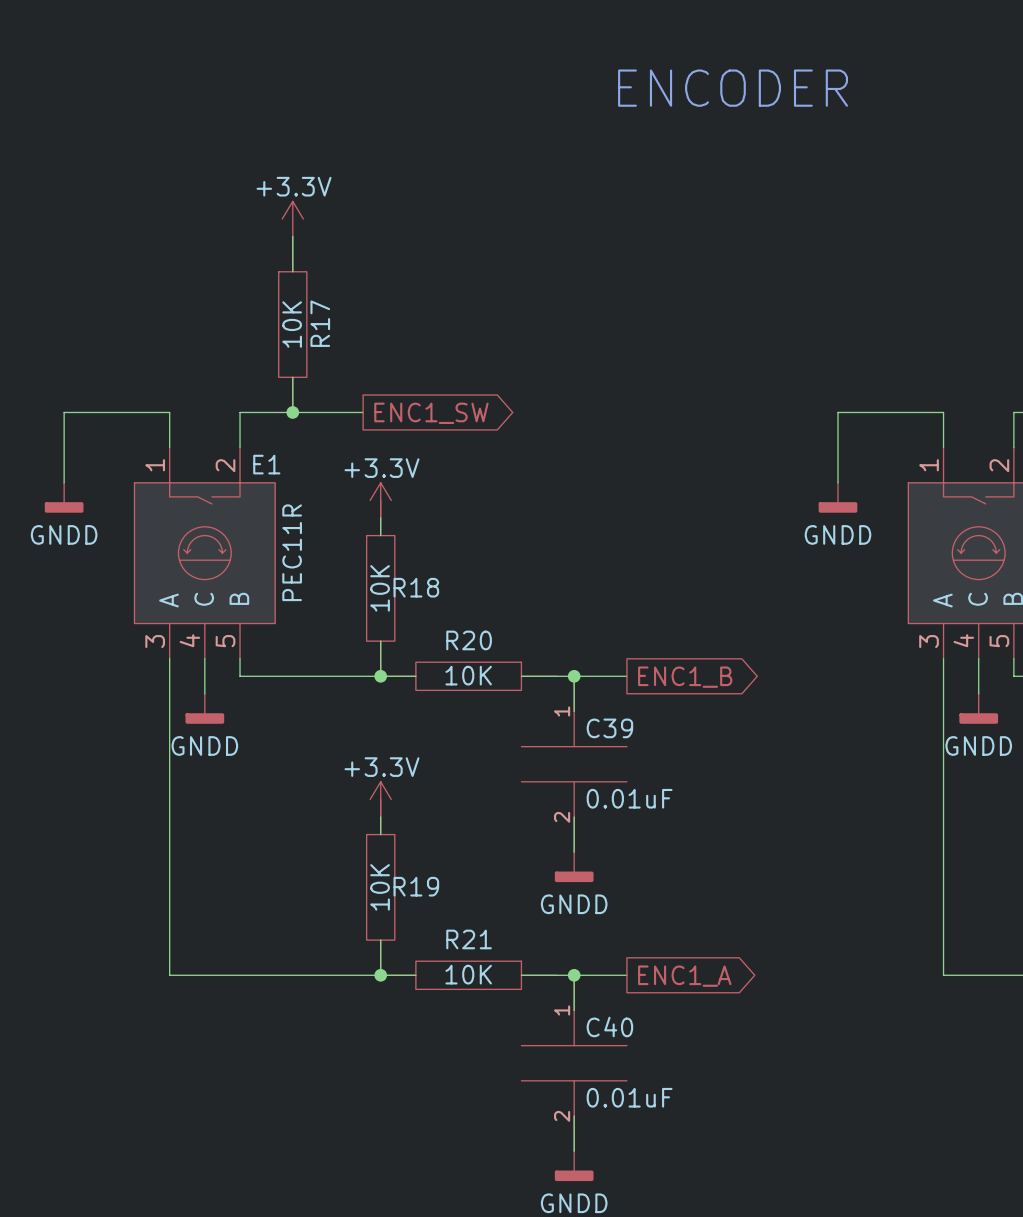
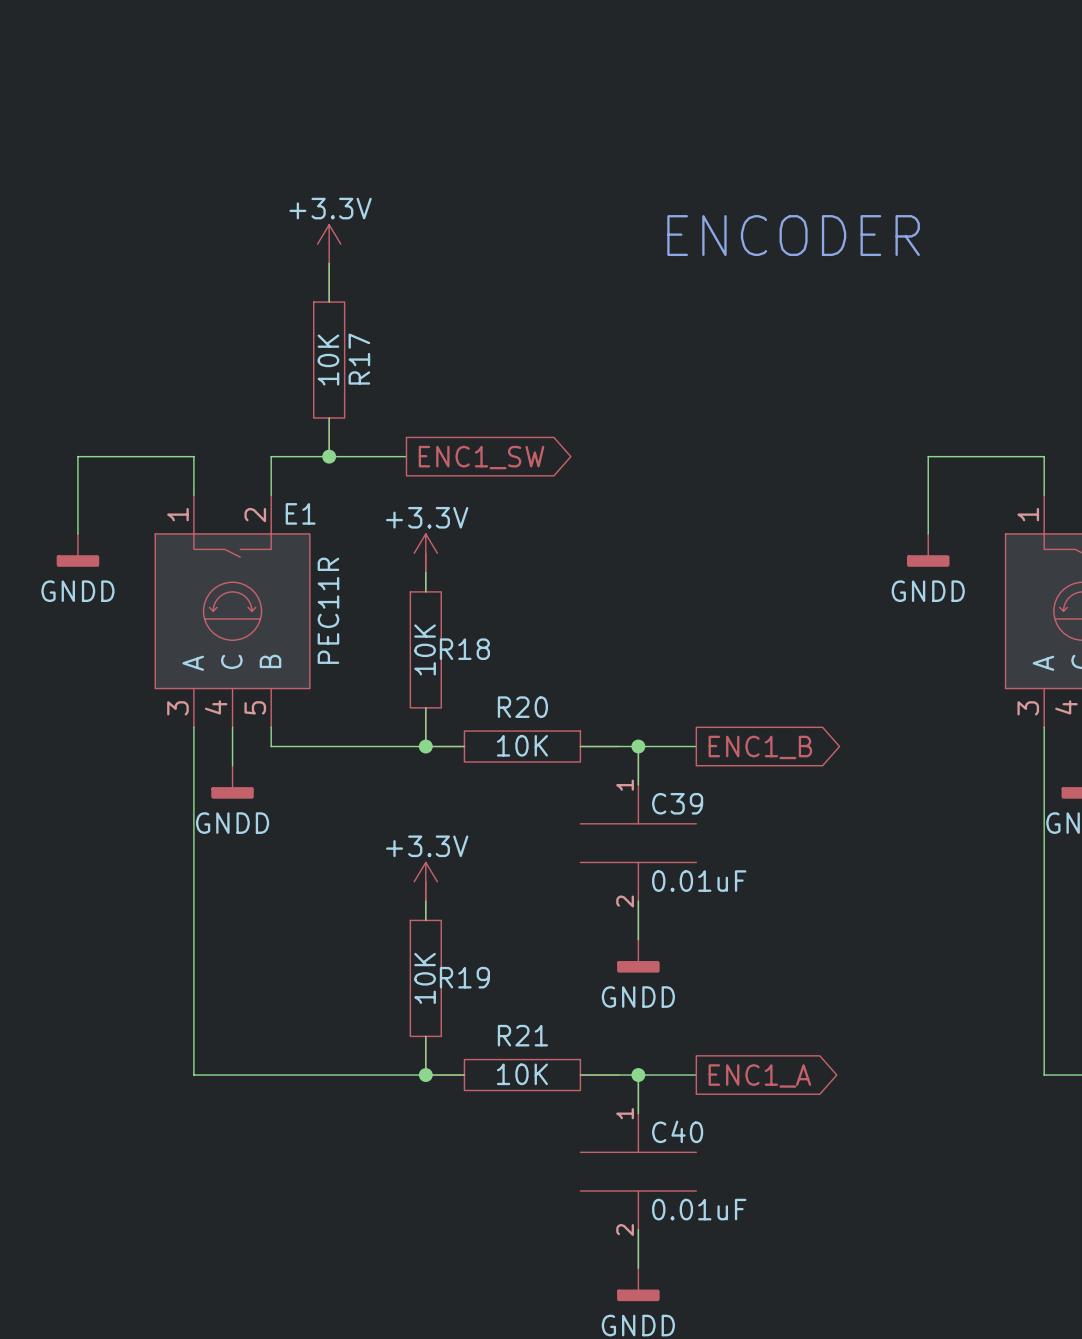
text position: ENCODER (733, 88) -> ENCODER (793, 235)

